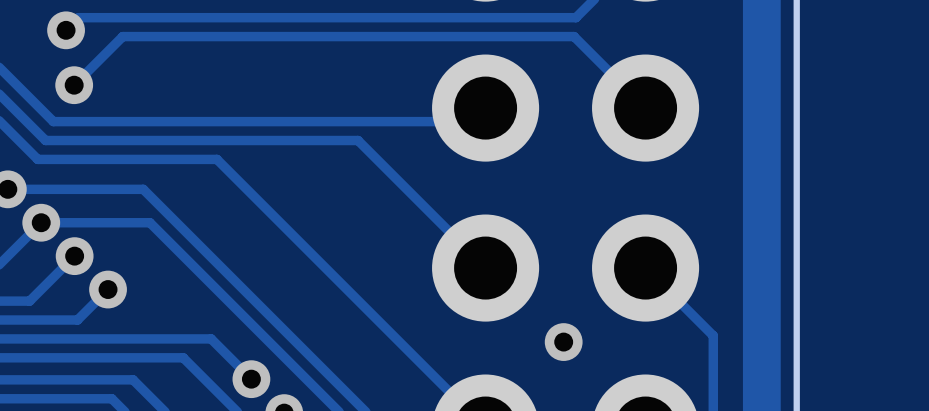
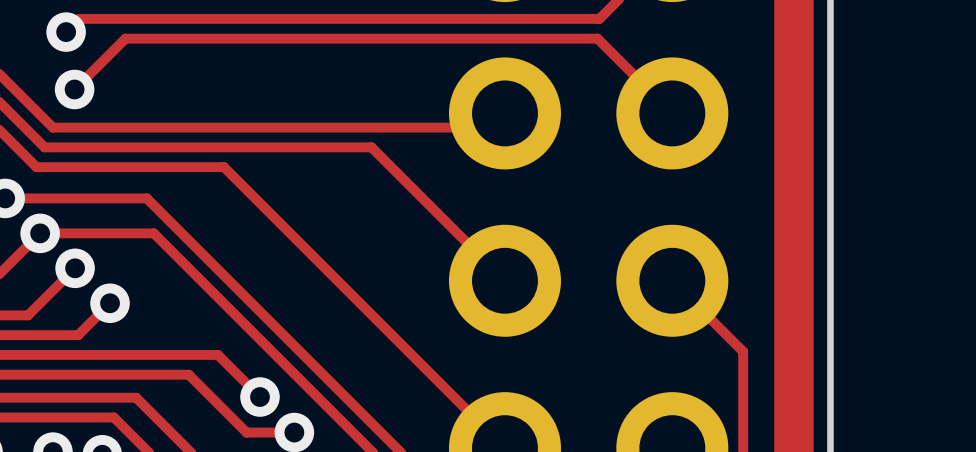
via: (563, 342) -> none

